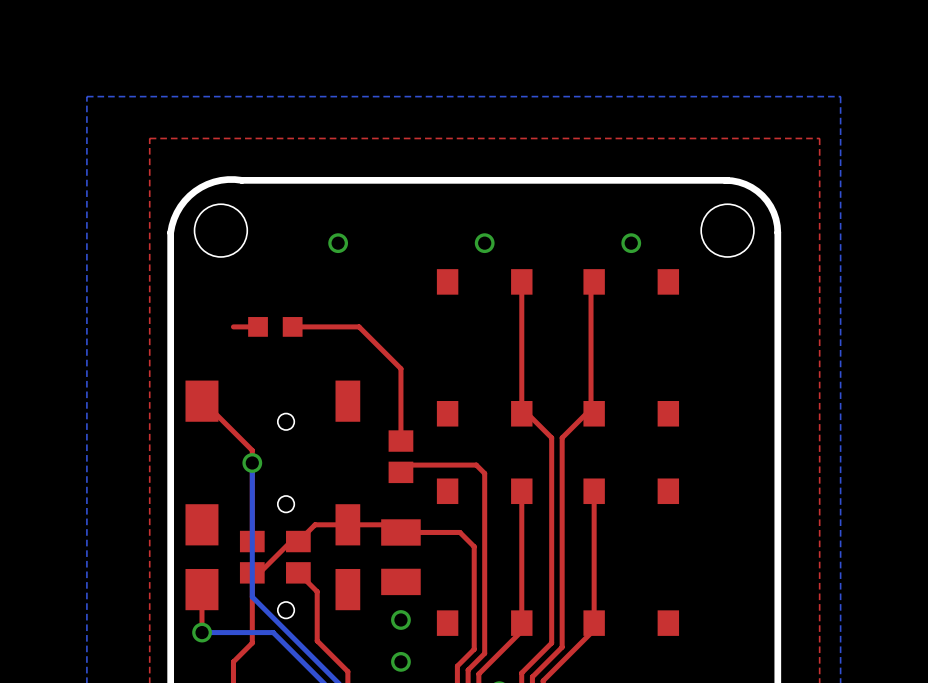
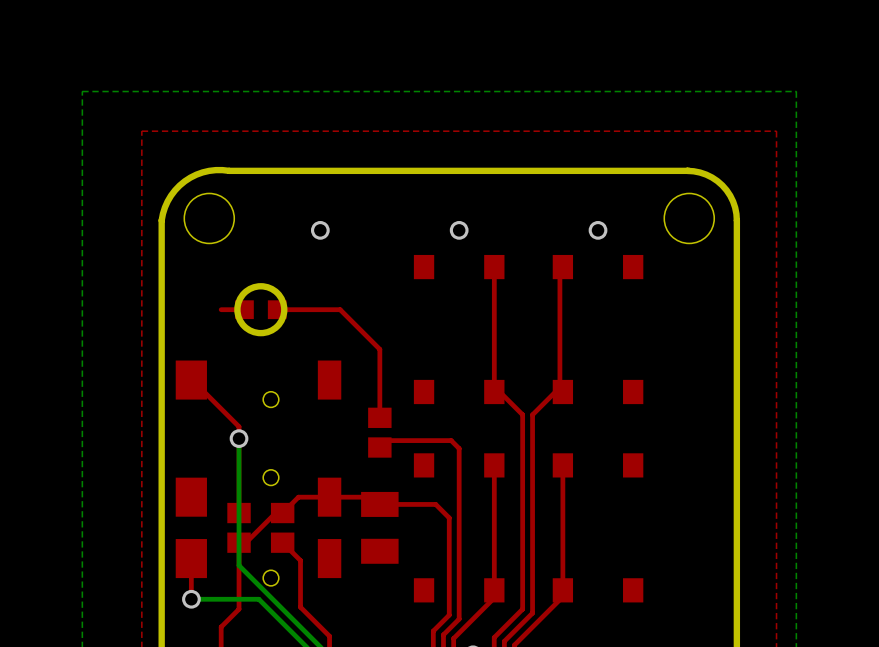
round board edge: none -> [234, 283, 288, 337]
via: (400, 620) -> none
via: (400, 661) -> none

